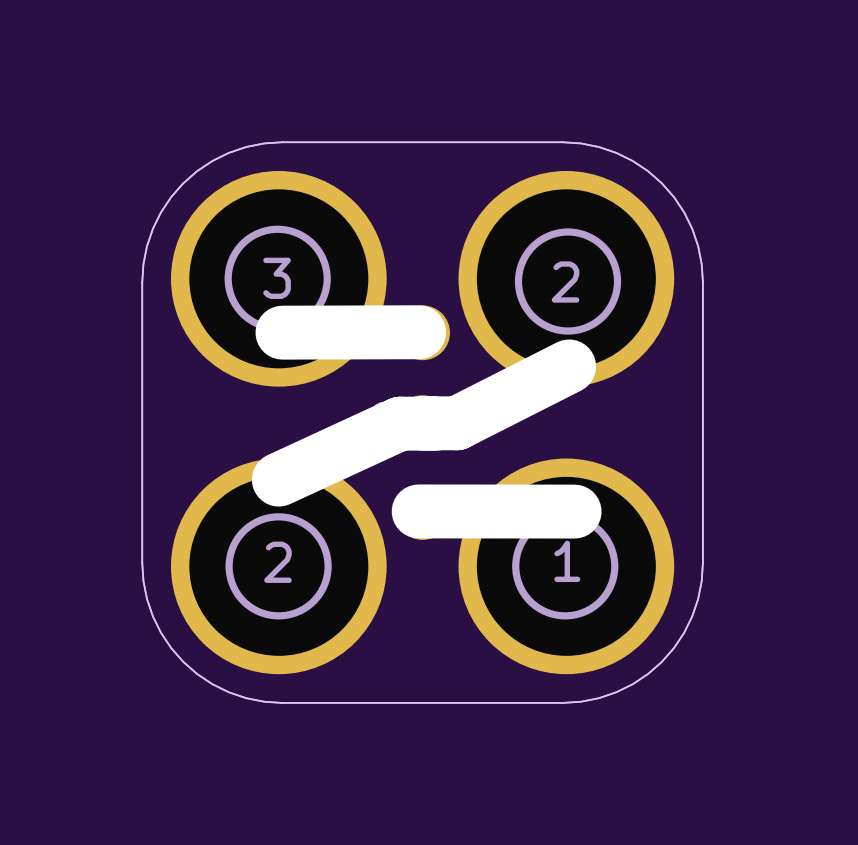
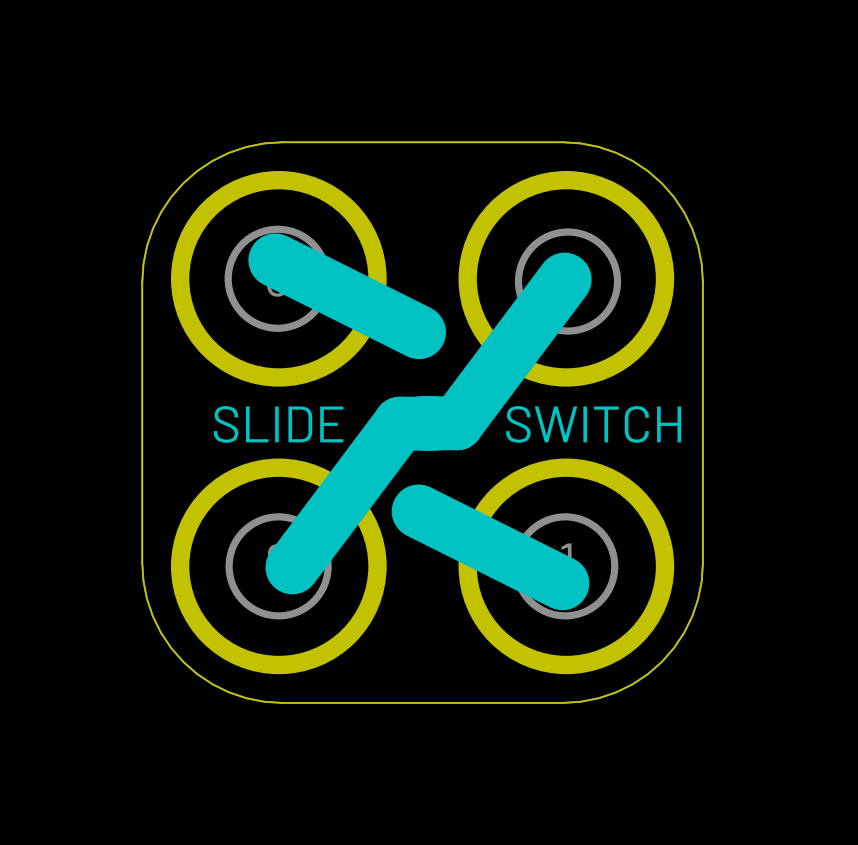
part footprint: [141, 141, 704, 704] -> [141, 141, 704, 704]

